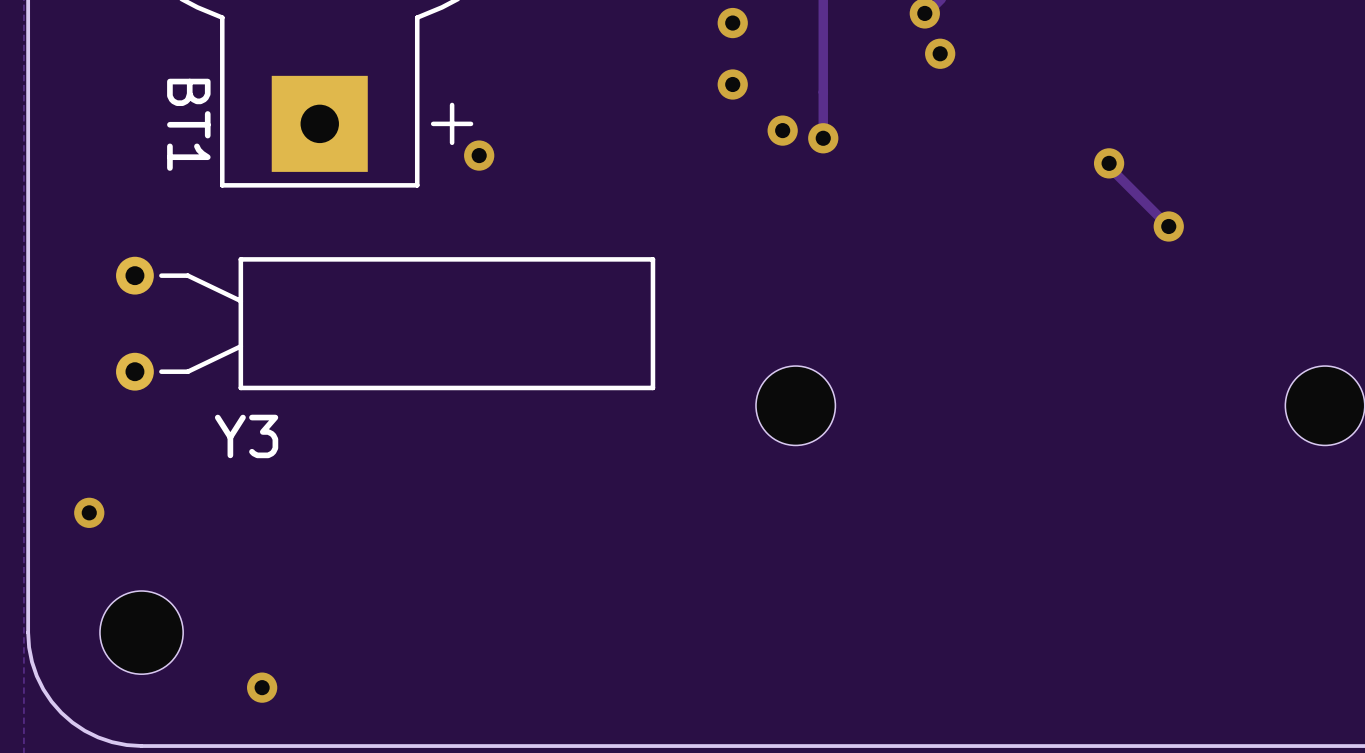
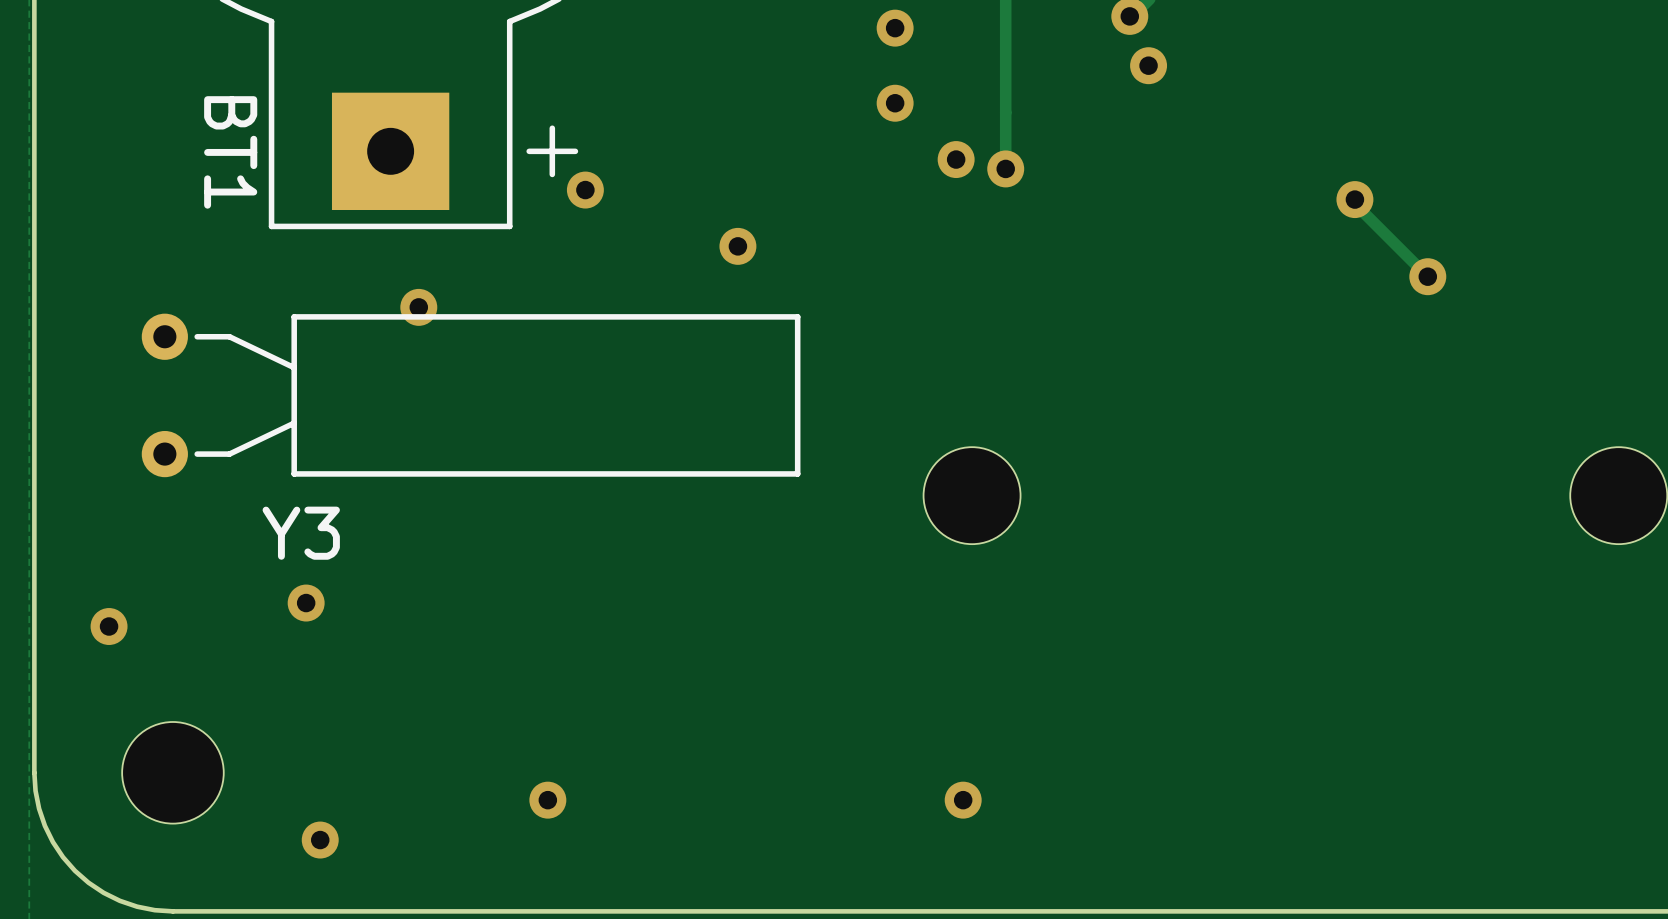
via: none -> (737, 246)
via: none -> (418, 307)
via: none -> (306, 603)
via: none -> (547, 800)
via: none -> (963, 800)

